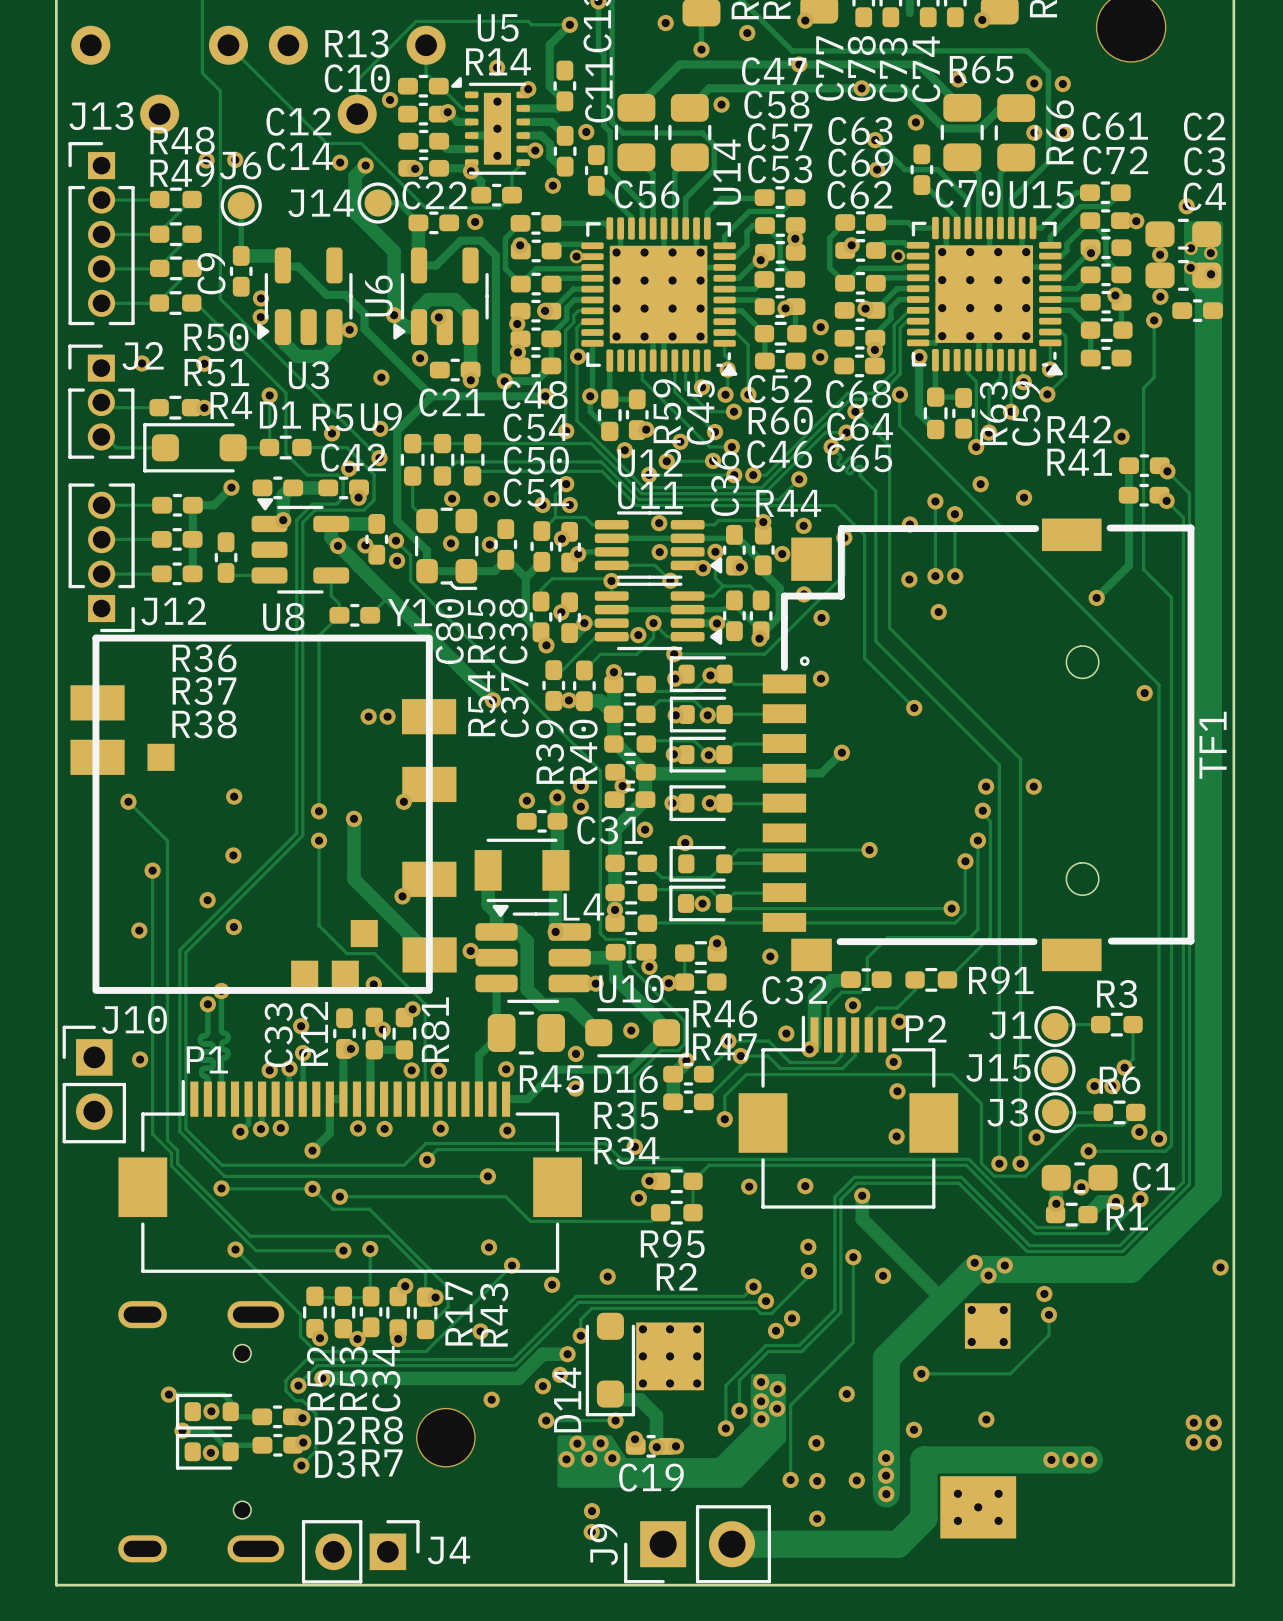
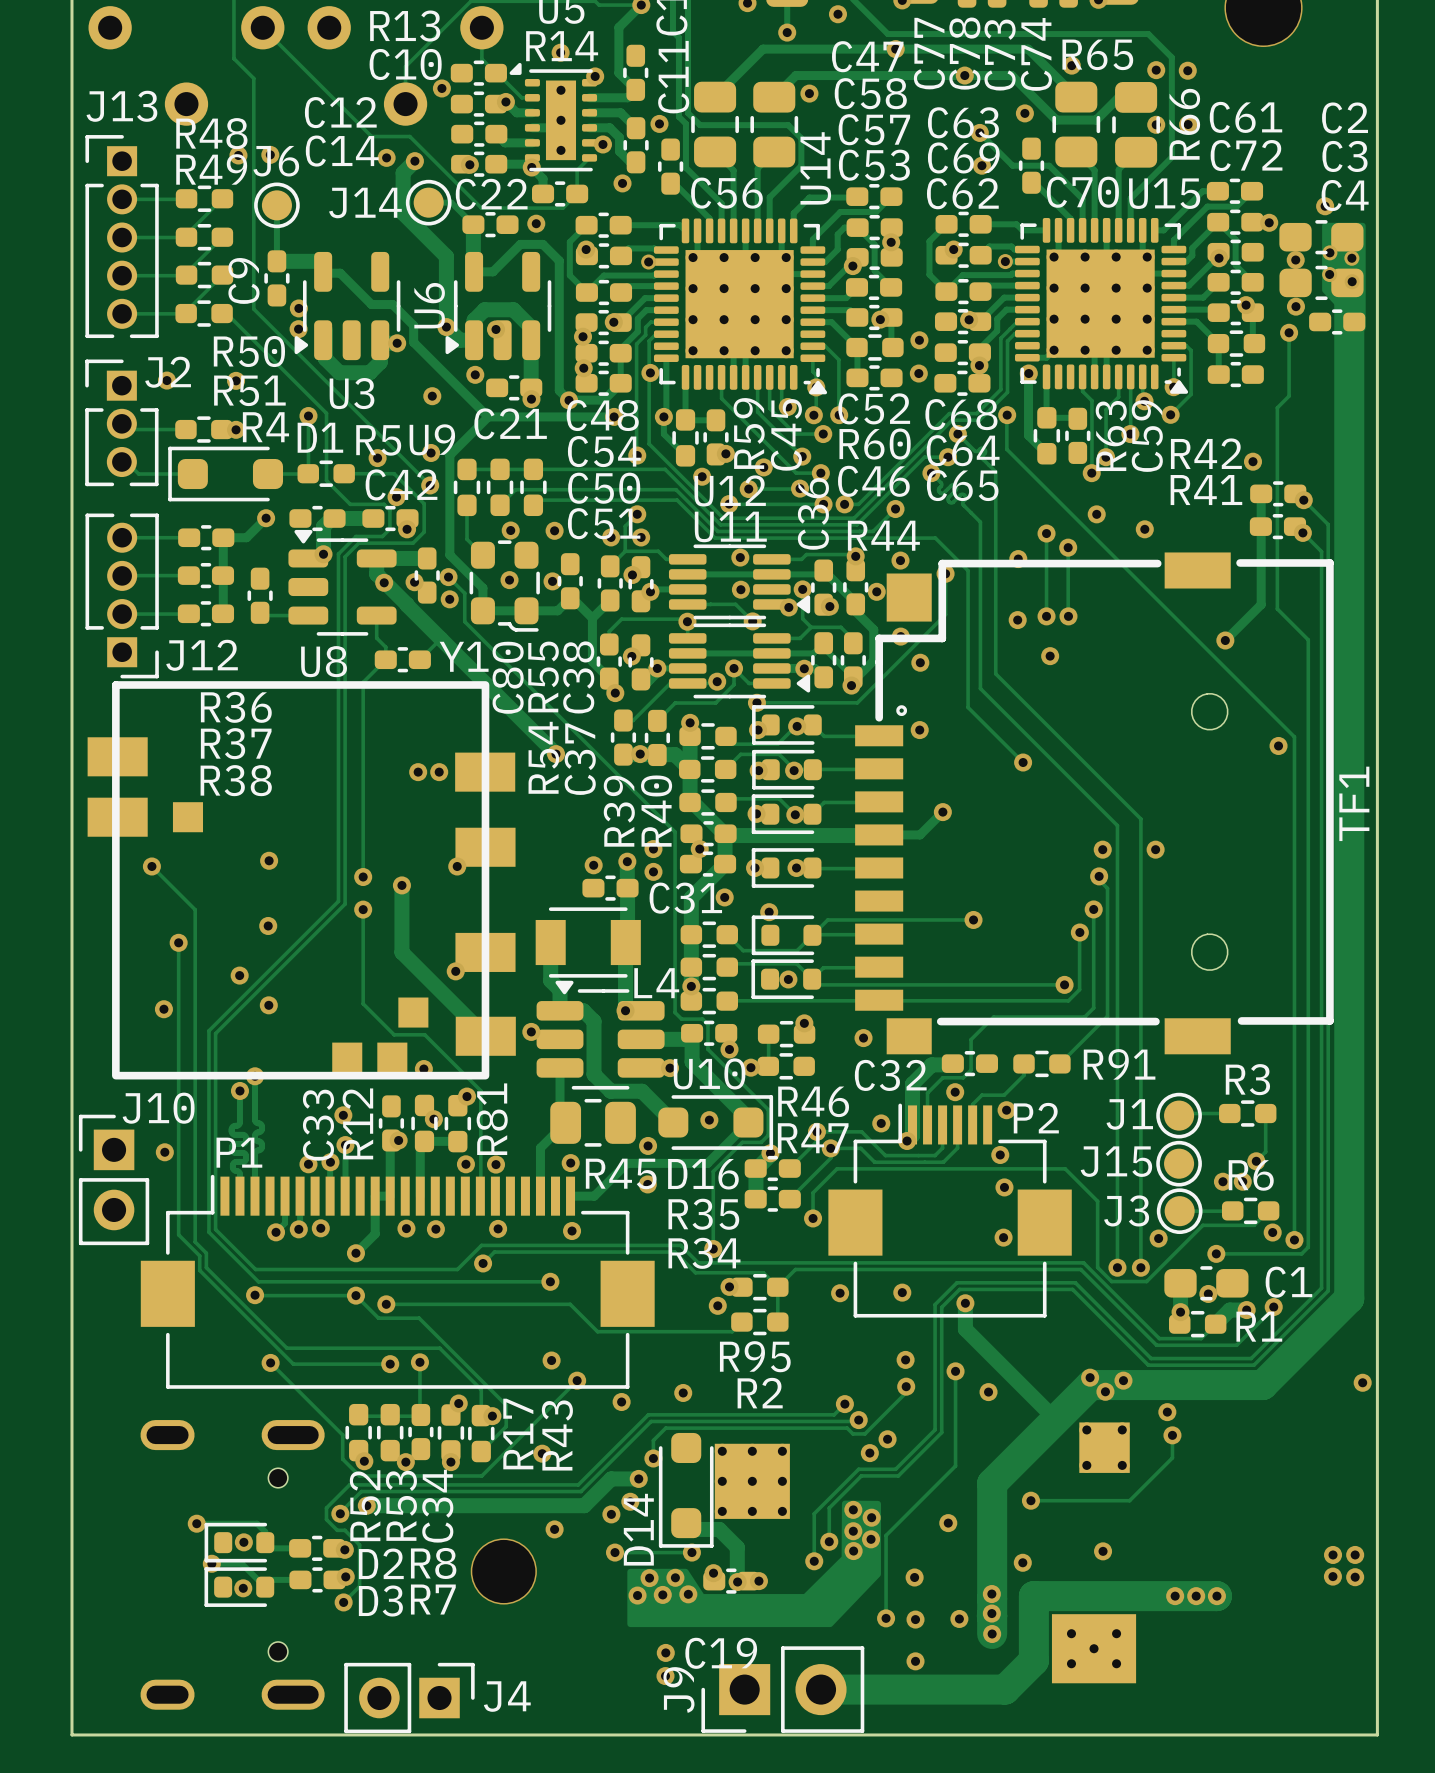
C19 name position: C19 (651, 1477) -> C19 (721, 1653)

